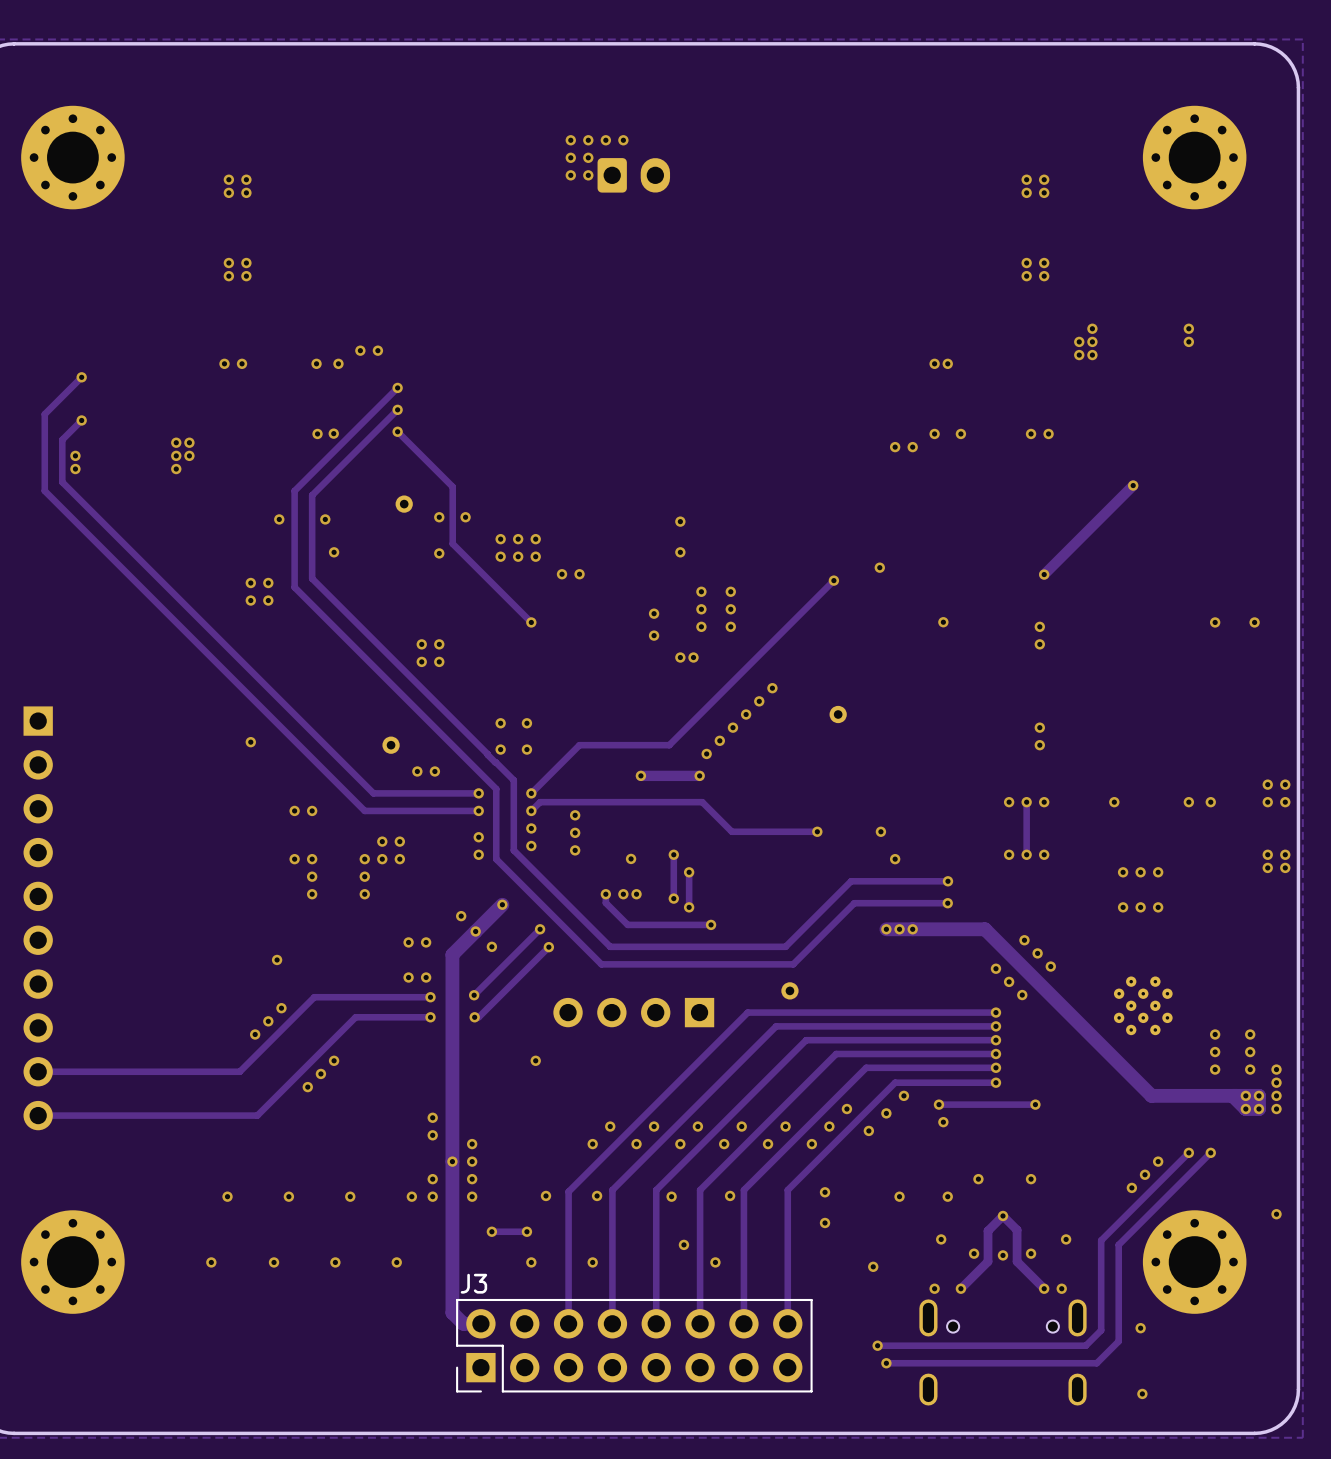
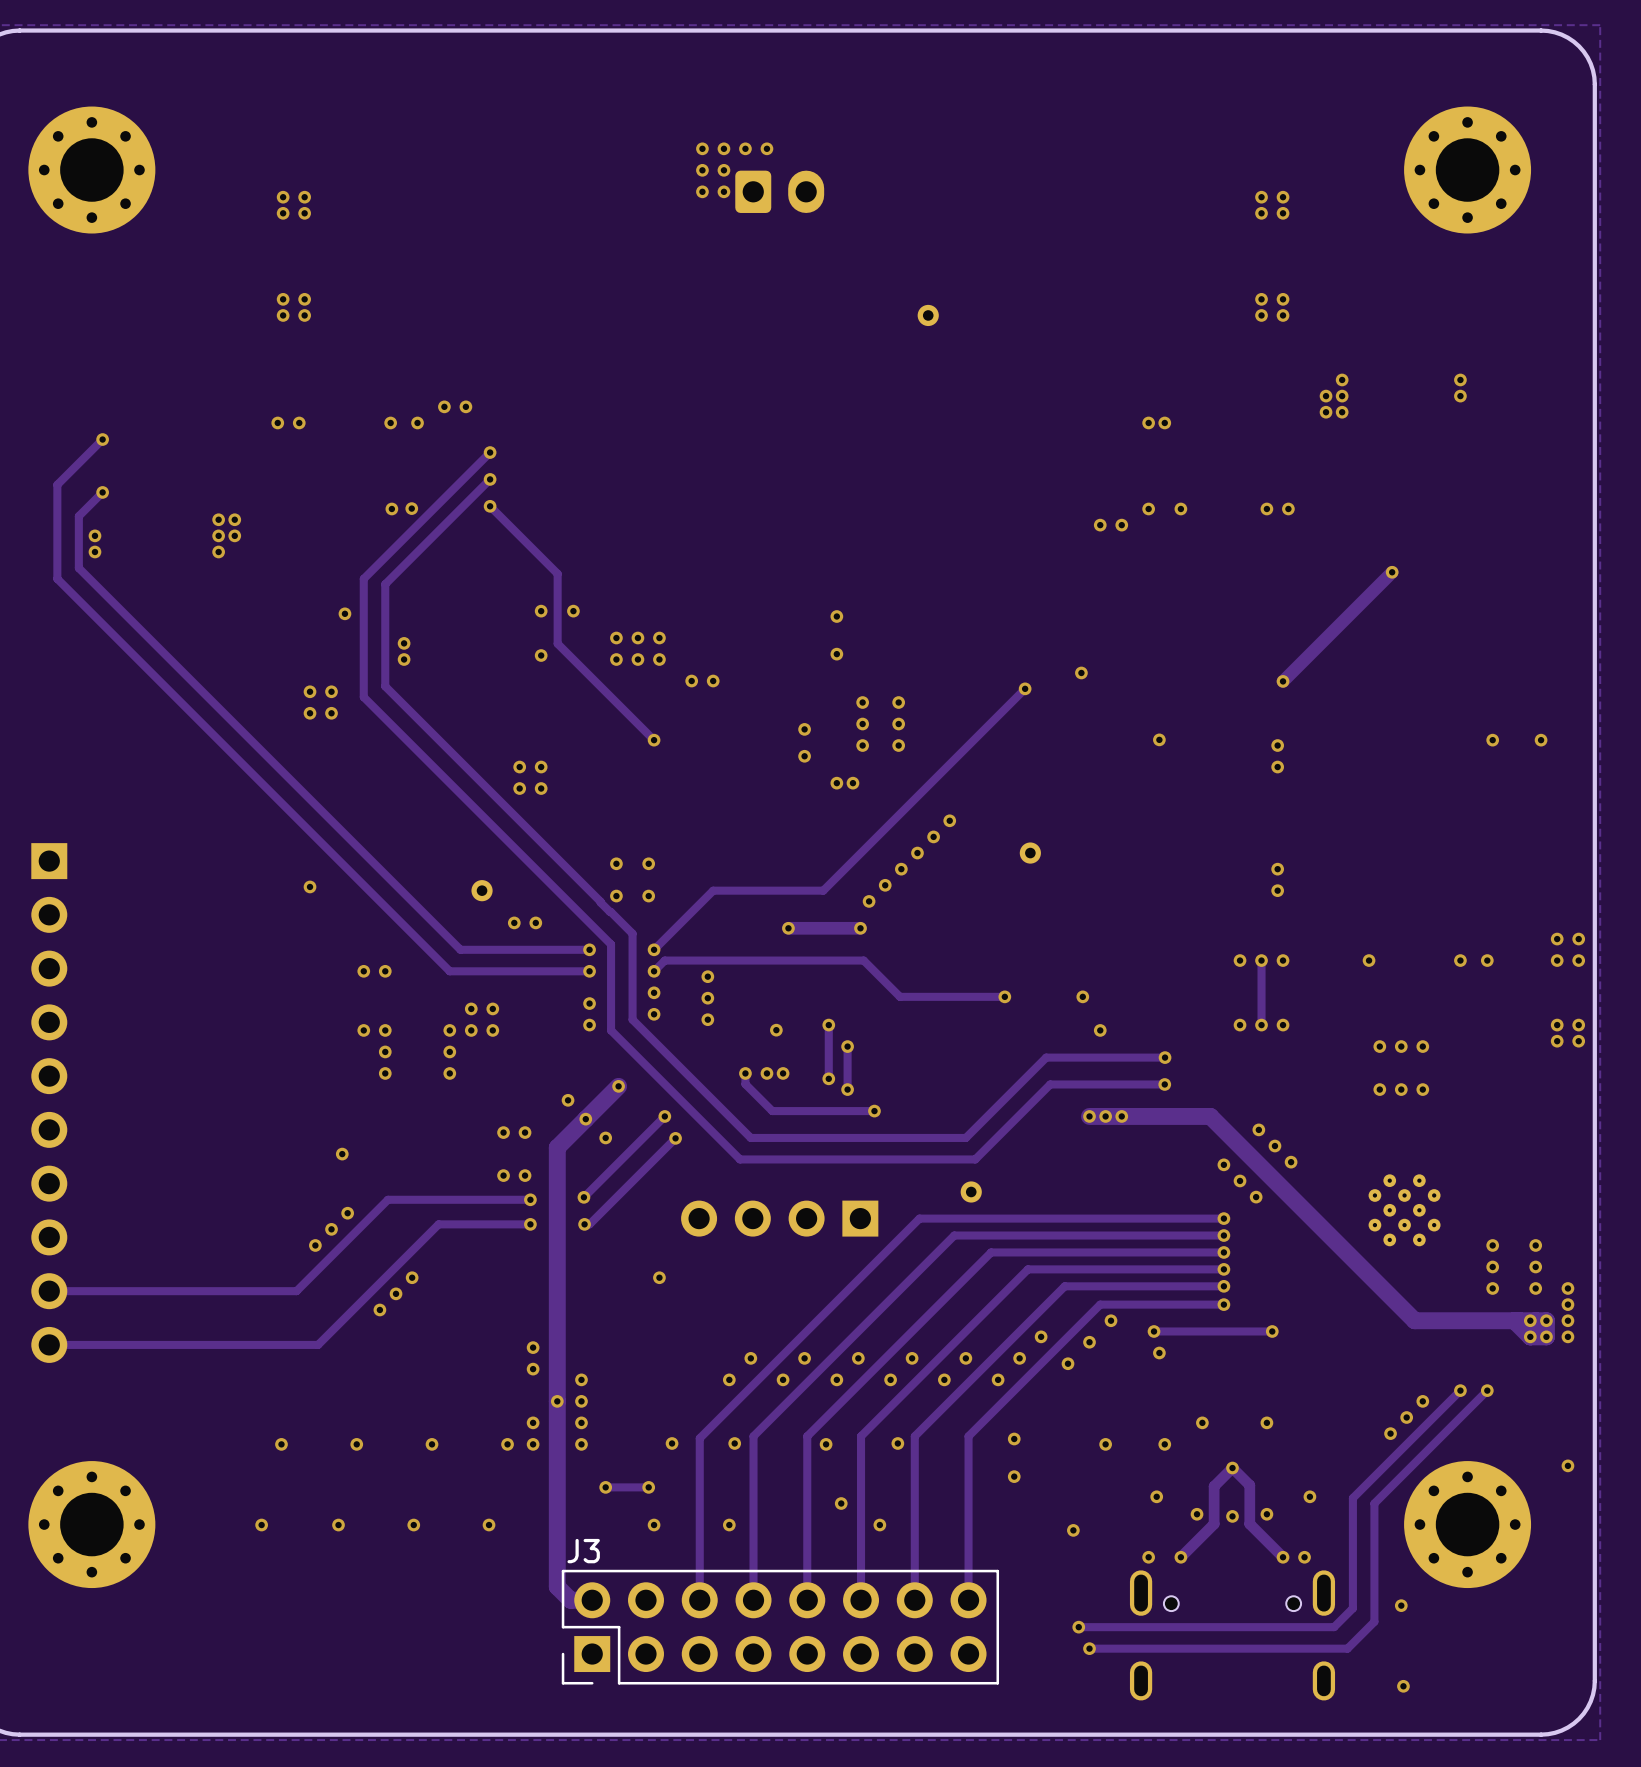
part position: (404, 504) -> (928, 315)
via: (325, 519) -> none
via: none -> (404, 643)
via: (334, 552) -> none
via: none -> (404, 659)

